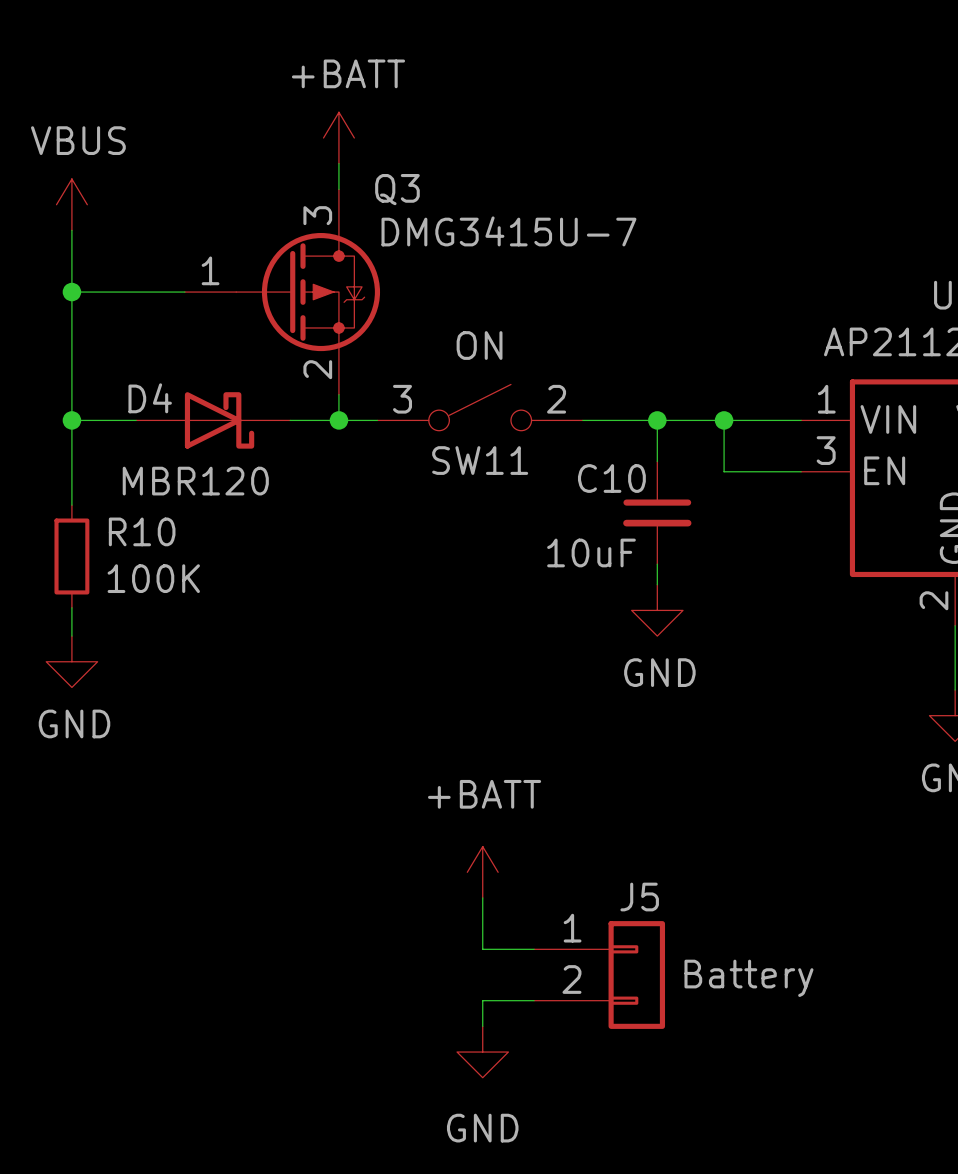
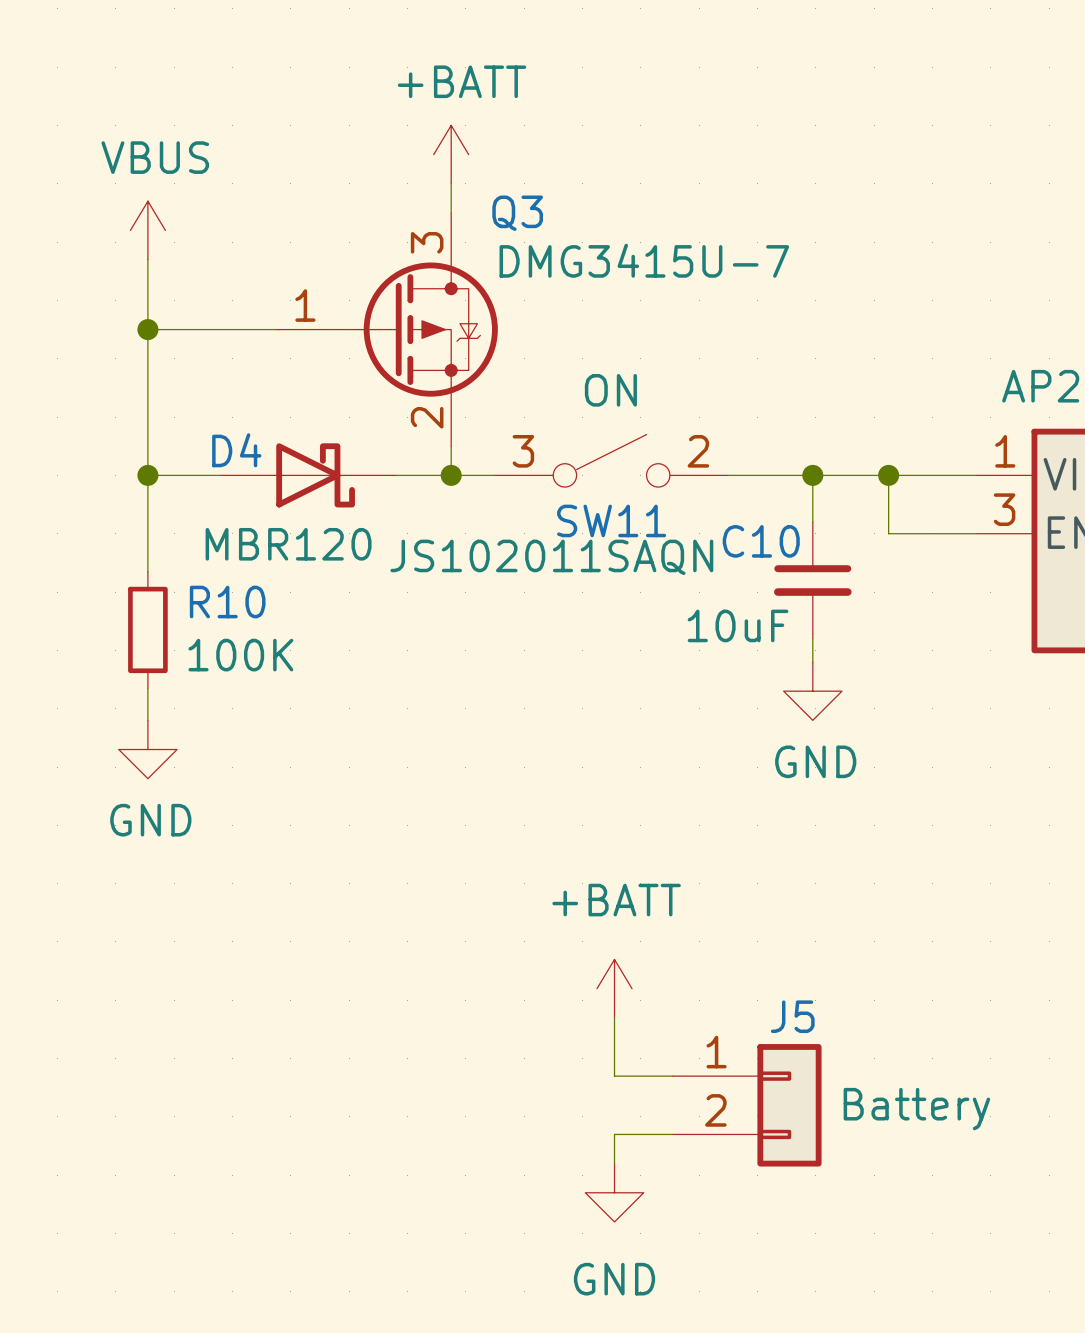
SW11 text: none -> JS102011SAQN (551, 557)

